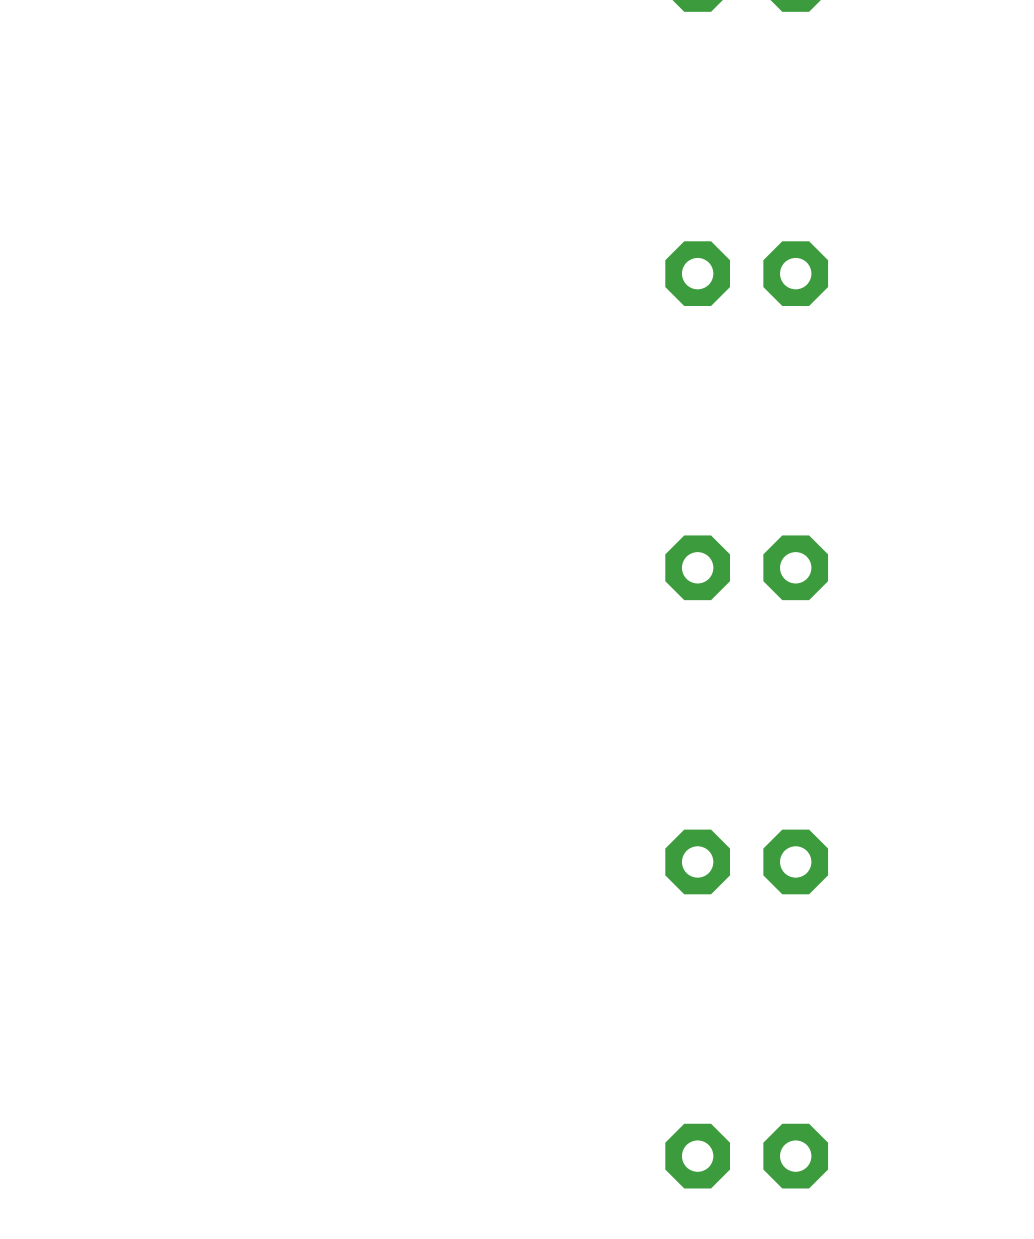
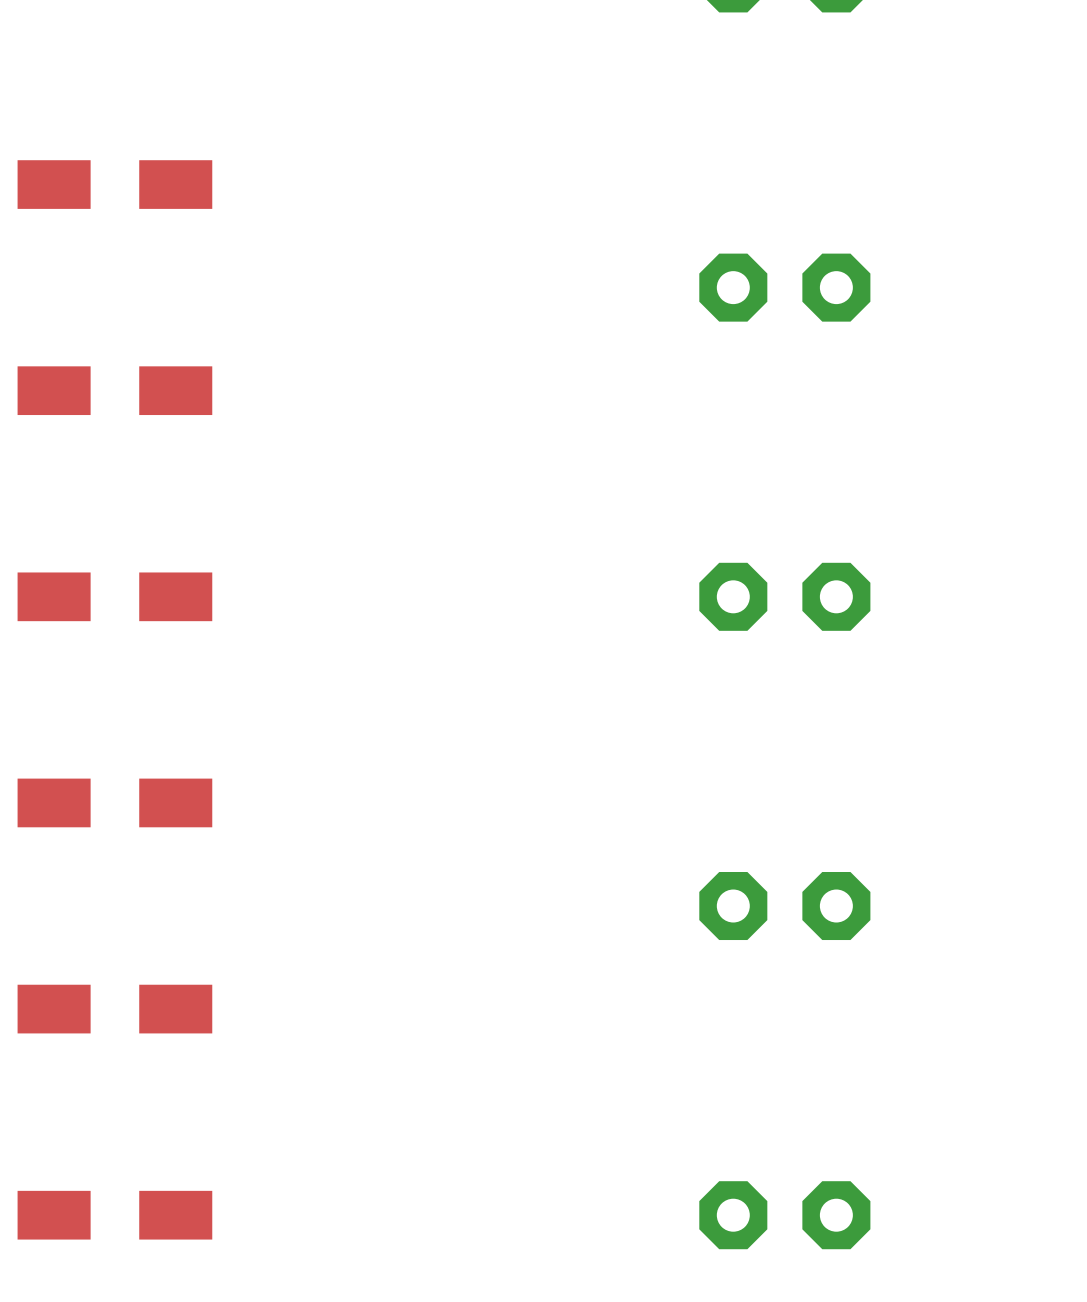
part: none -> (114, 184)
part: none -> (114, 390)
part: none -> (114, 596)
part: none -> (114, 802)
part: none -> (114, 1009)
part: none -> (114, 1215)

